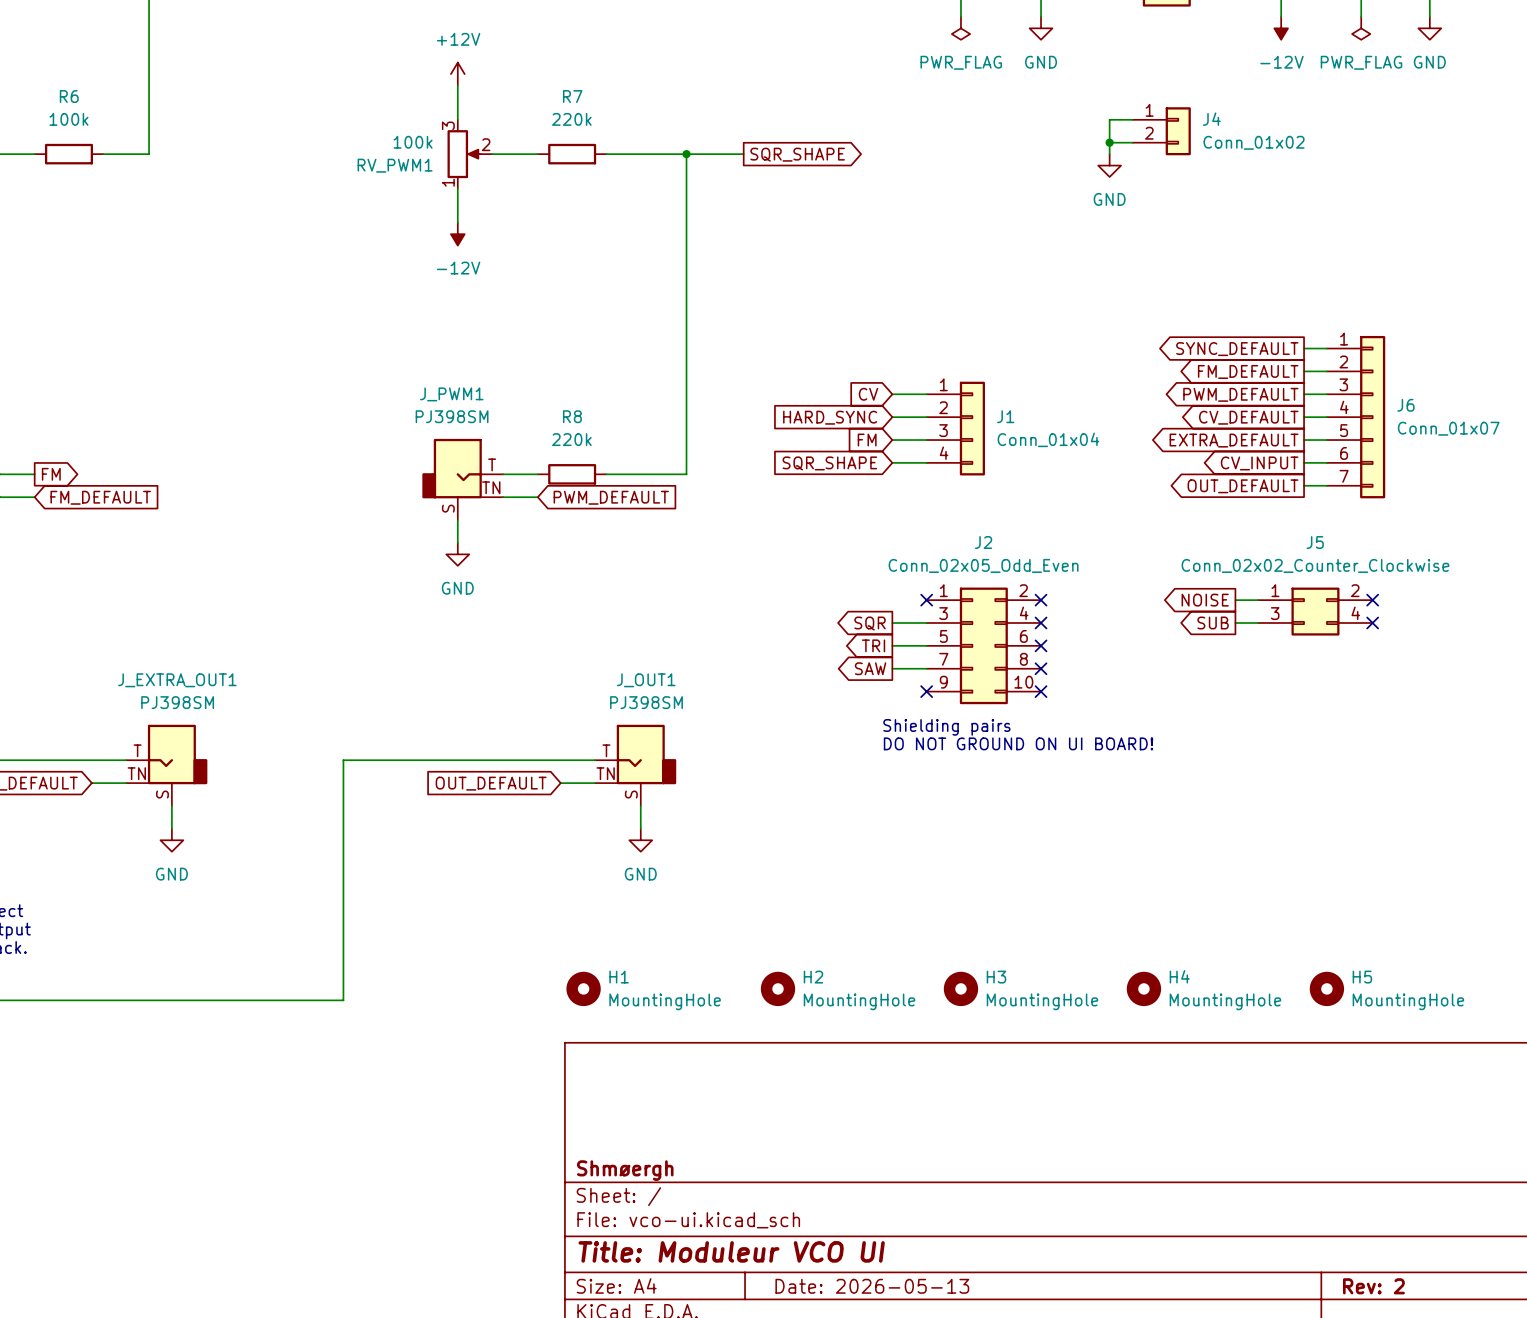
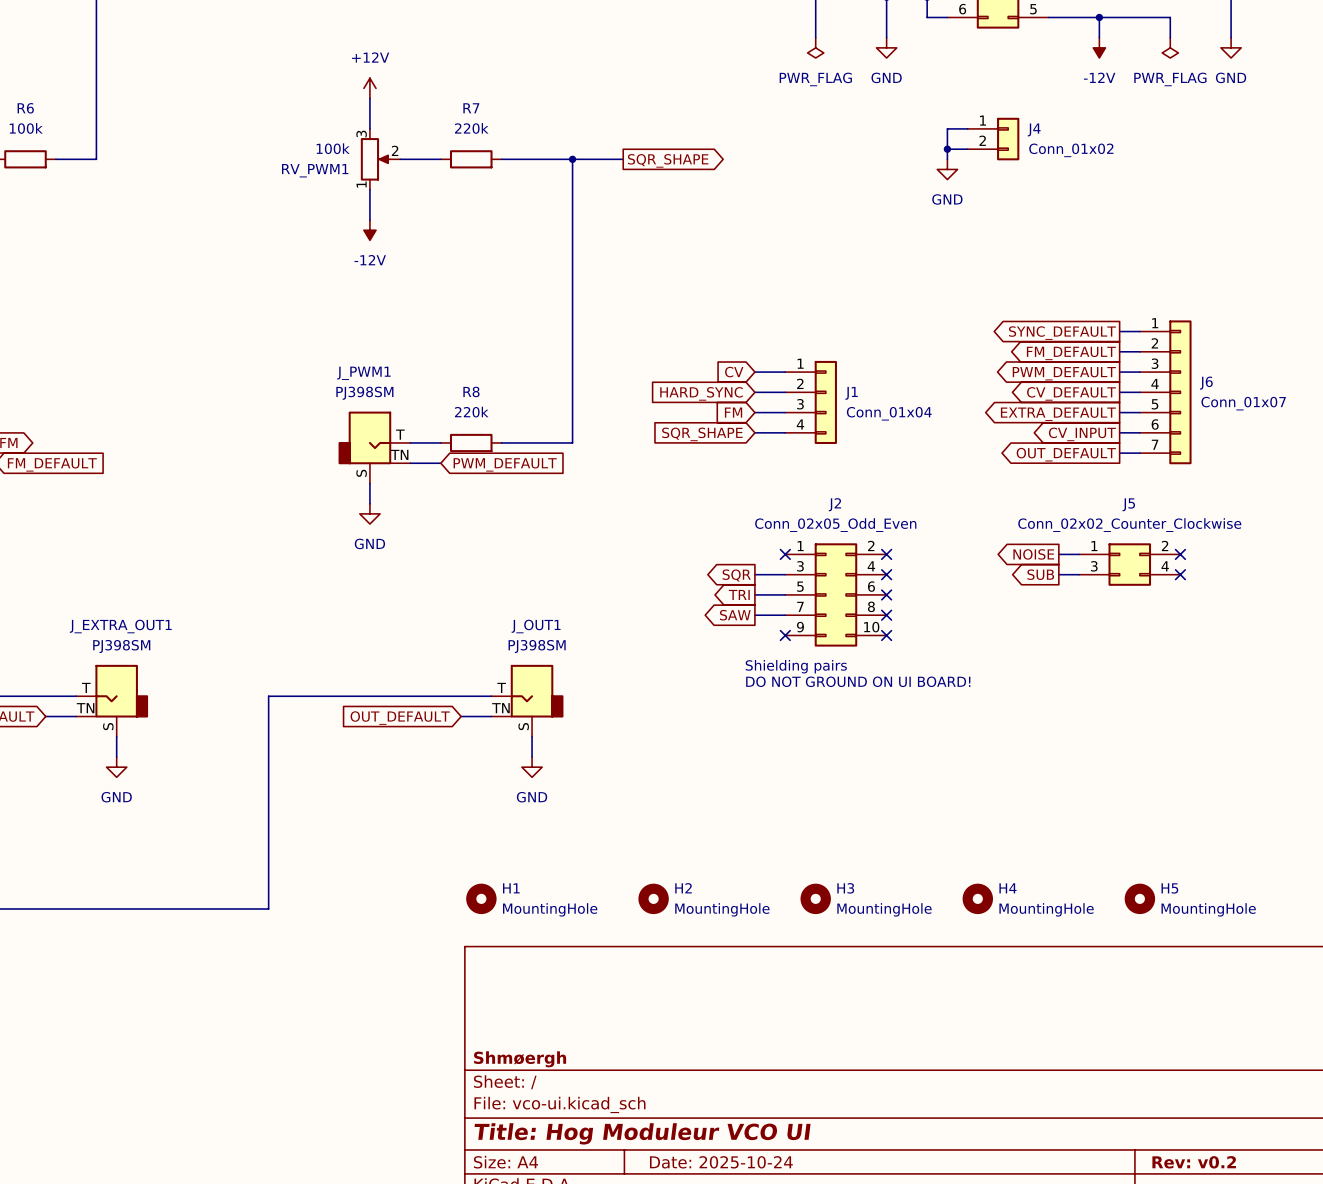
title block: Title: Moduleur VCO UI (731, 1251) -> Title: Hog Moduleur VCO UI (642, 1133)
title block: Date: 2026-05-13 (872, 1286) -> Date: 2025-10-24 (721, 1162)
title block: Rev: 2 (1373, 1286) -> Rev: v0.2 (1194, 1162)

